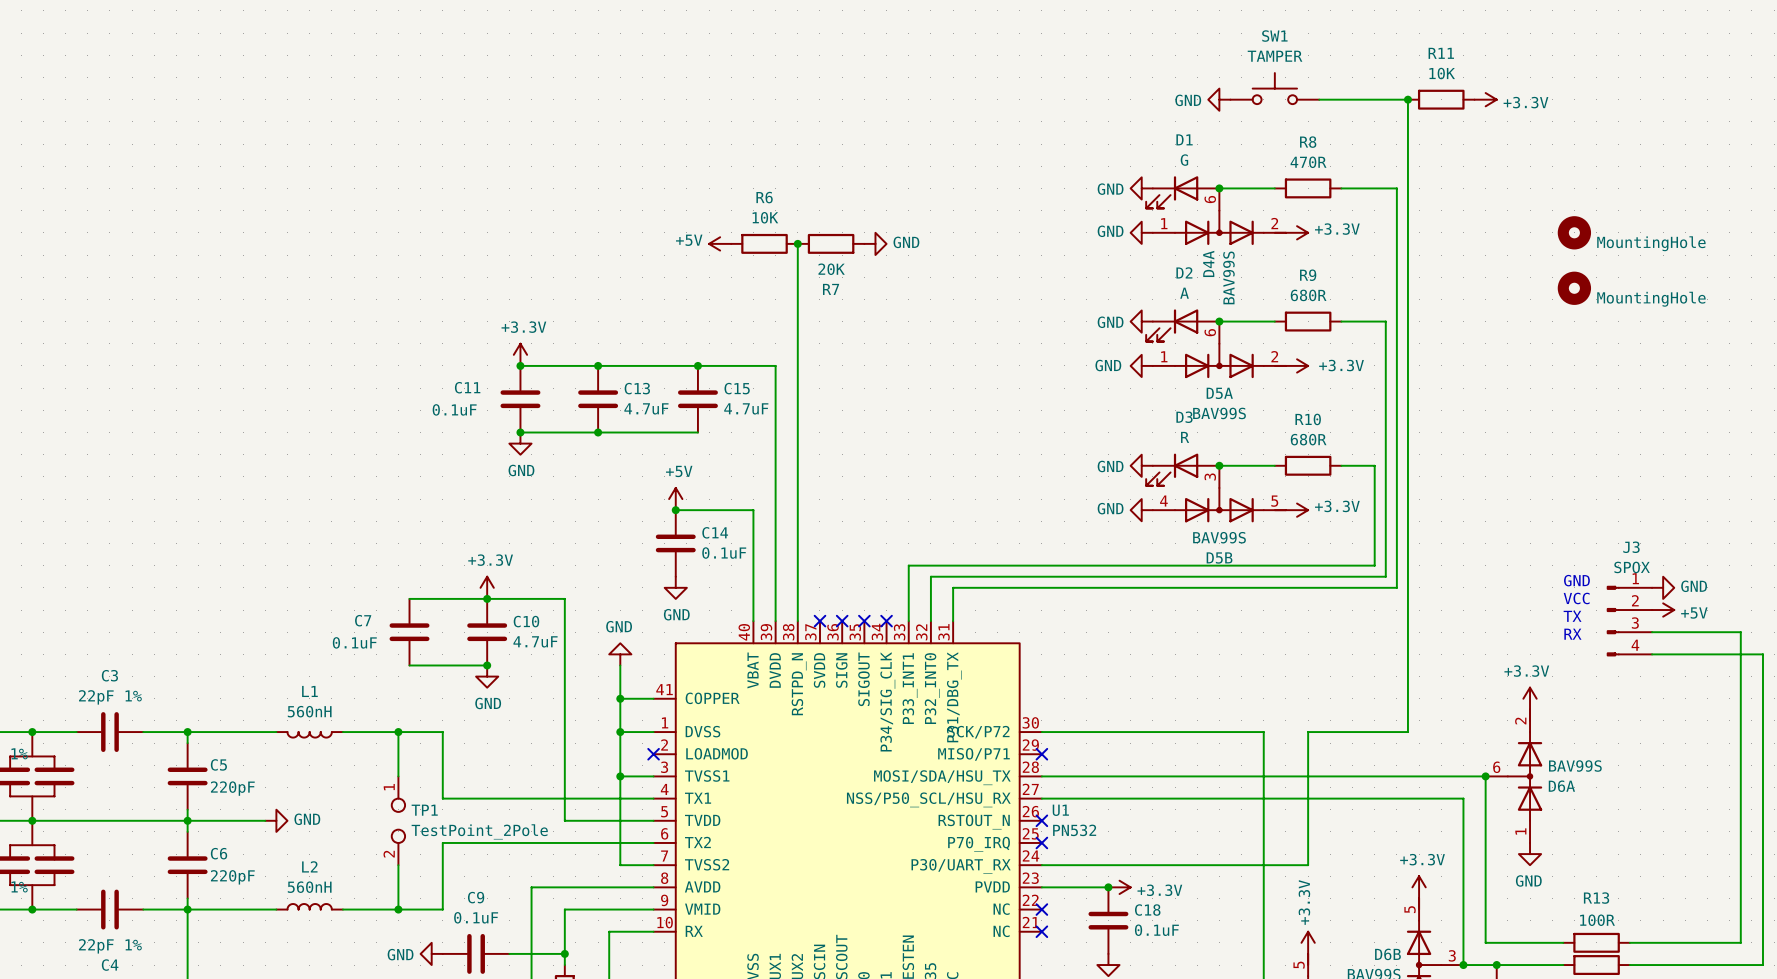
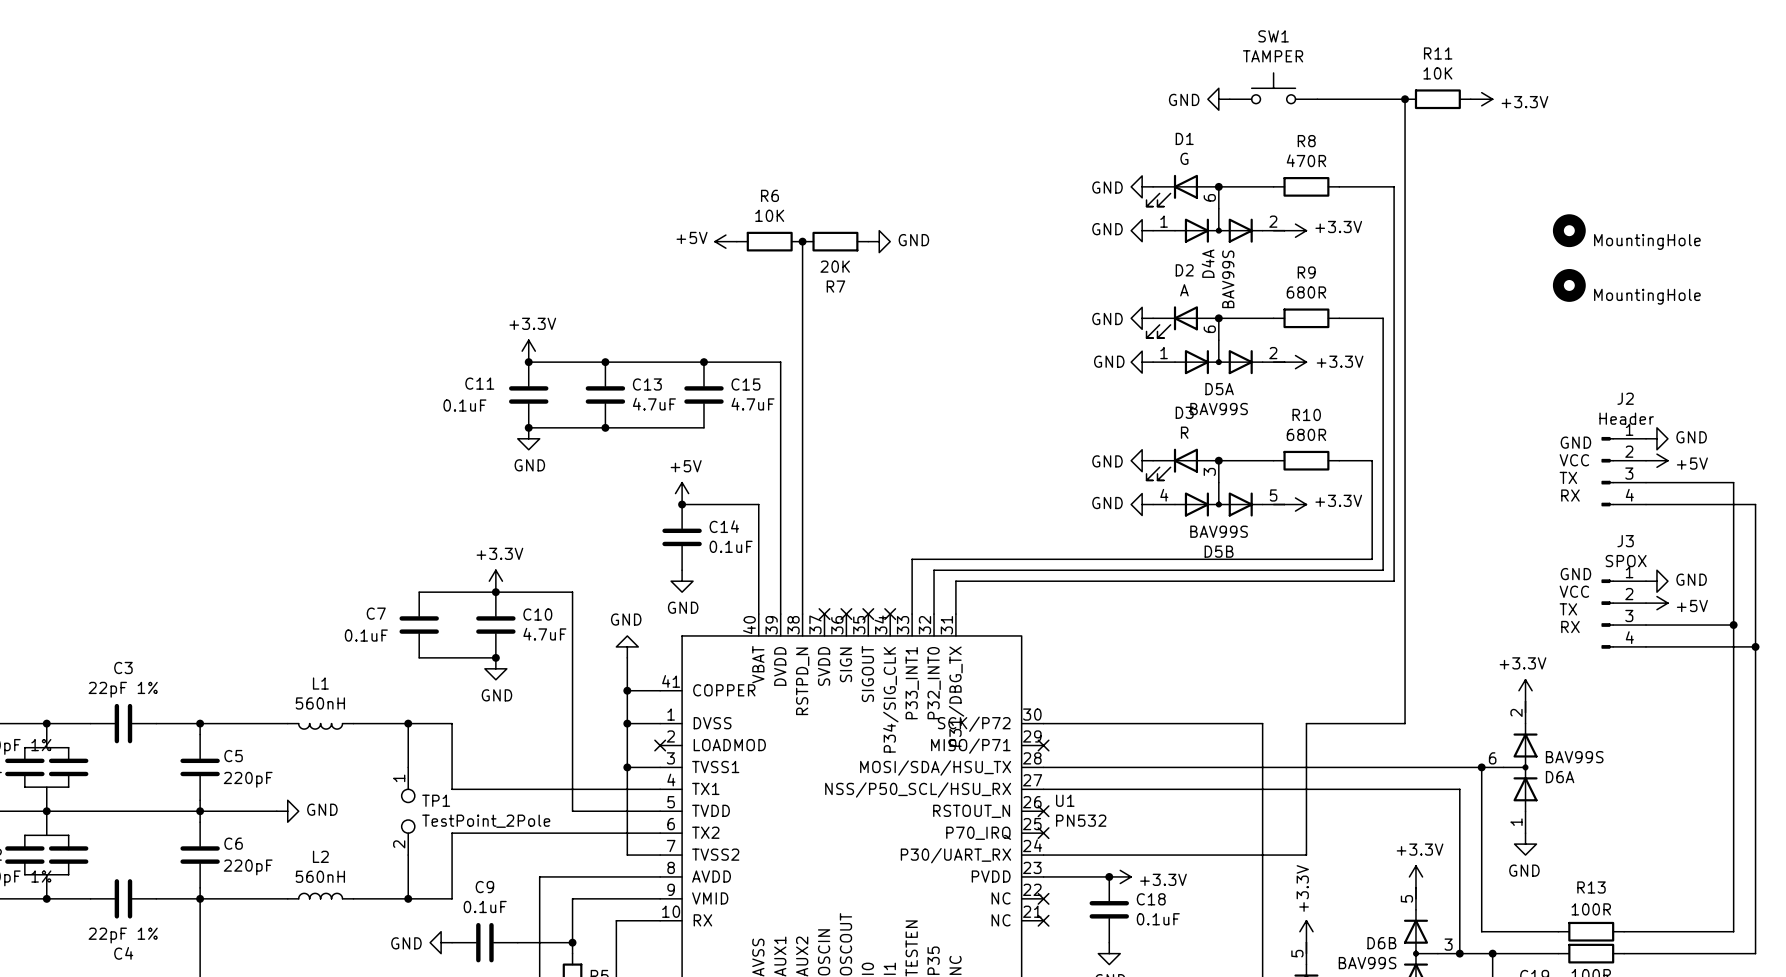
power symbol: none -> GND (1656, 438)
text: none -> GND (1575, 442)
text: none -> VCC (1574, 460)
power symbol: none -> +5V (1656, 460)
J2: none -> Header (1623, 471)
text: none -> TX (1568, 477)
wire: none -> (1646, 482) (1733, 482) (1733, 625)
text: none -> RX (1570, 495)
wire: none -> (1646, 504) (1755, 504) (1755, 646)
junction: none -> (1733, 625)
junction: none -> (1755, 646)

